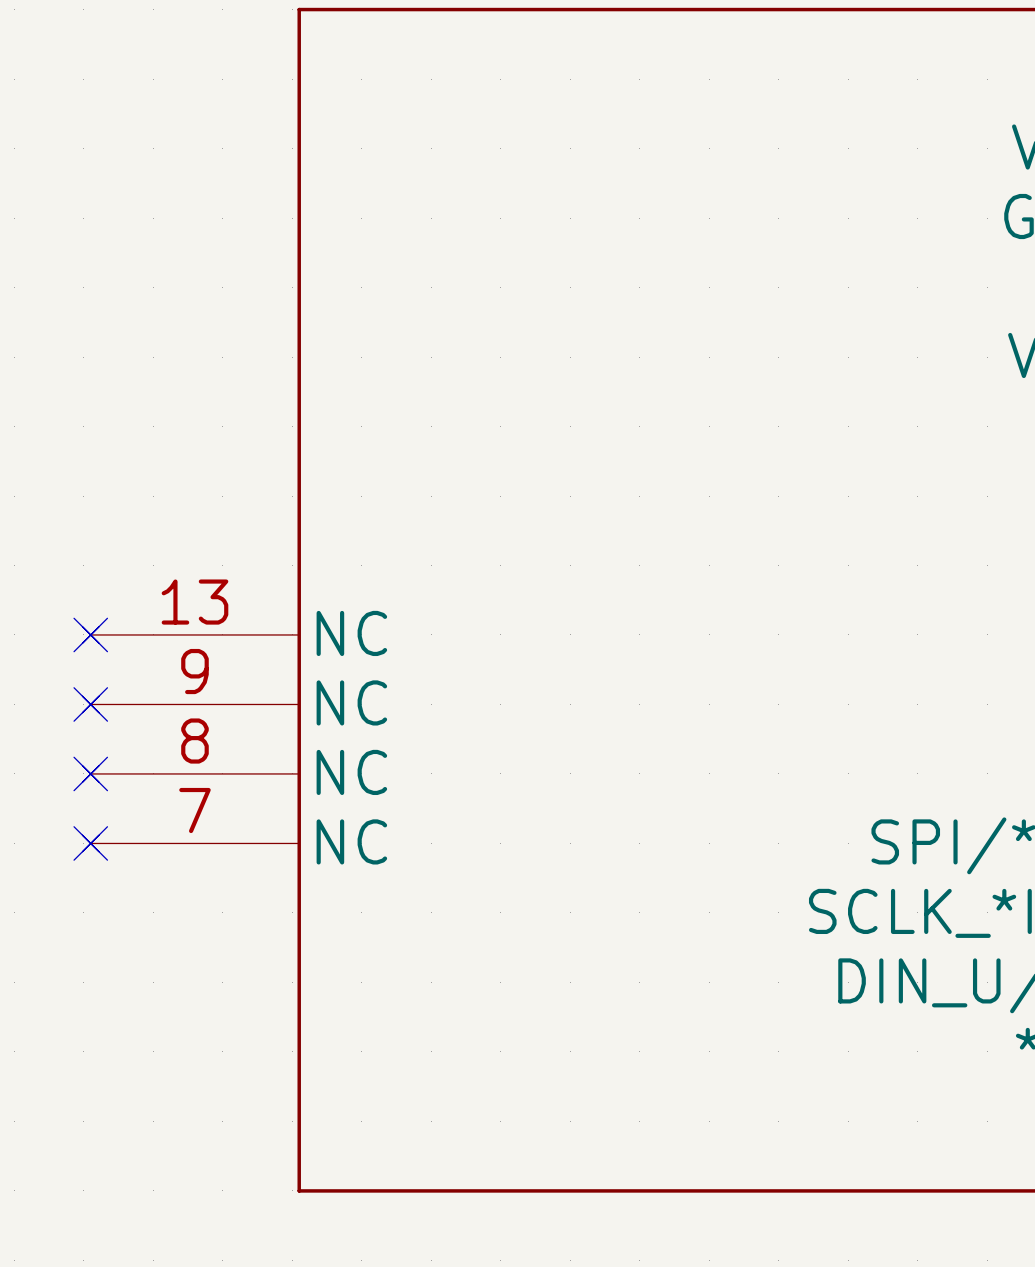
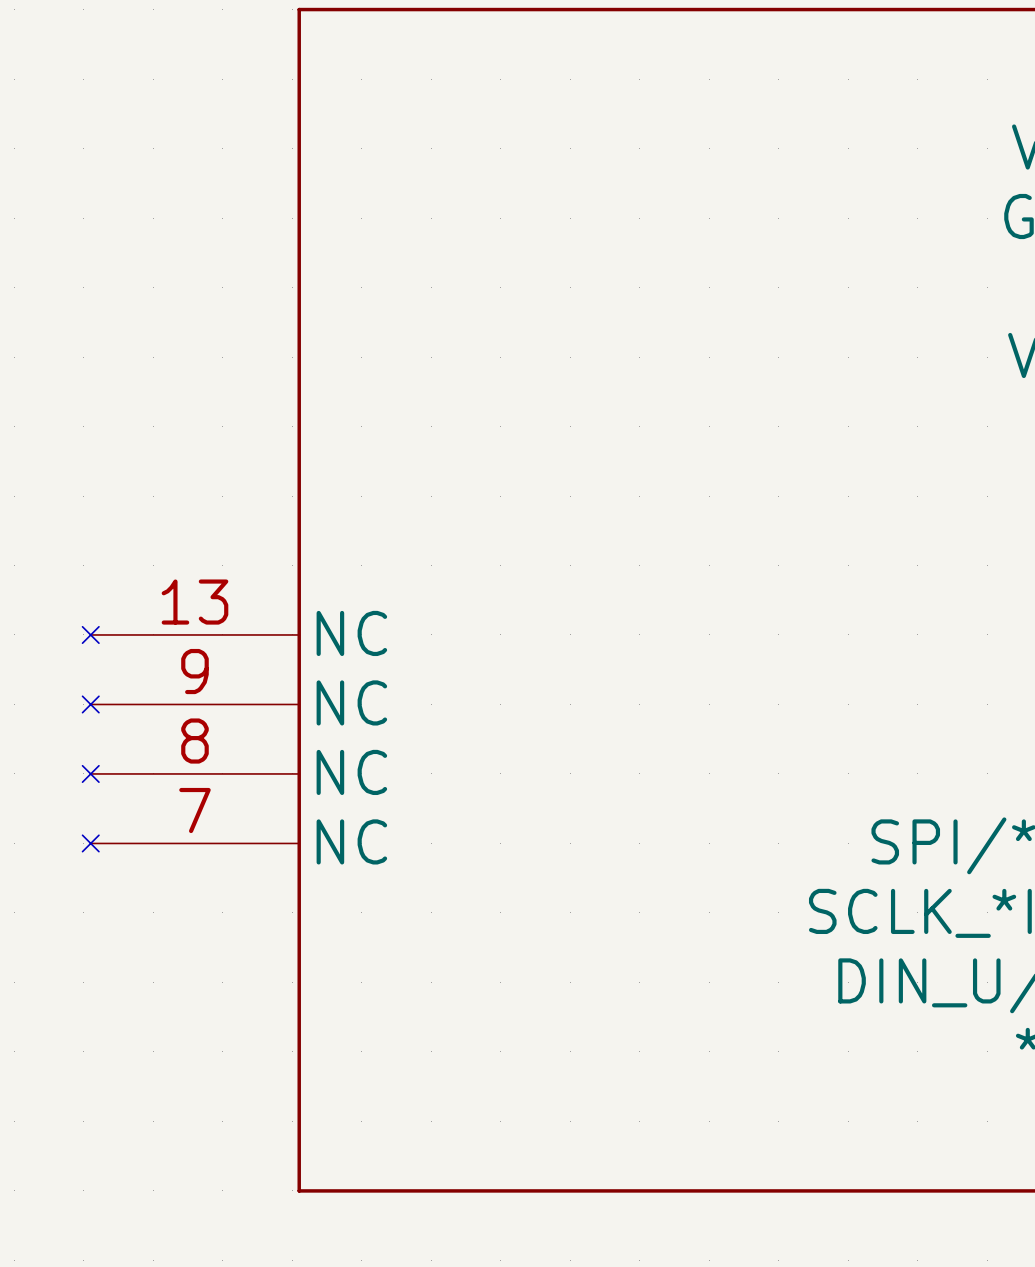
no-connect mark: (90, 634) -> none
no-connect mark: (90, 704) -> none
no-connect mark: (90, 773) -> none
no-connect mark: (90, 843) -> none

